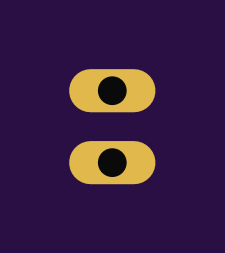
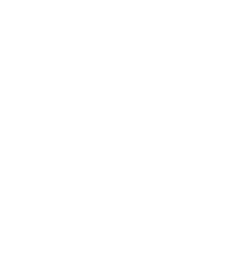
part: (112, 126) -> none

